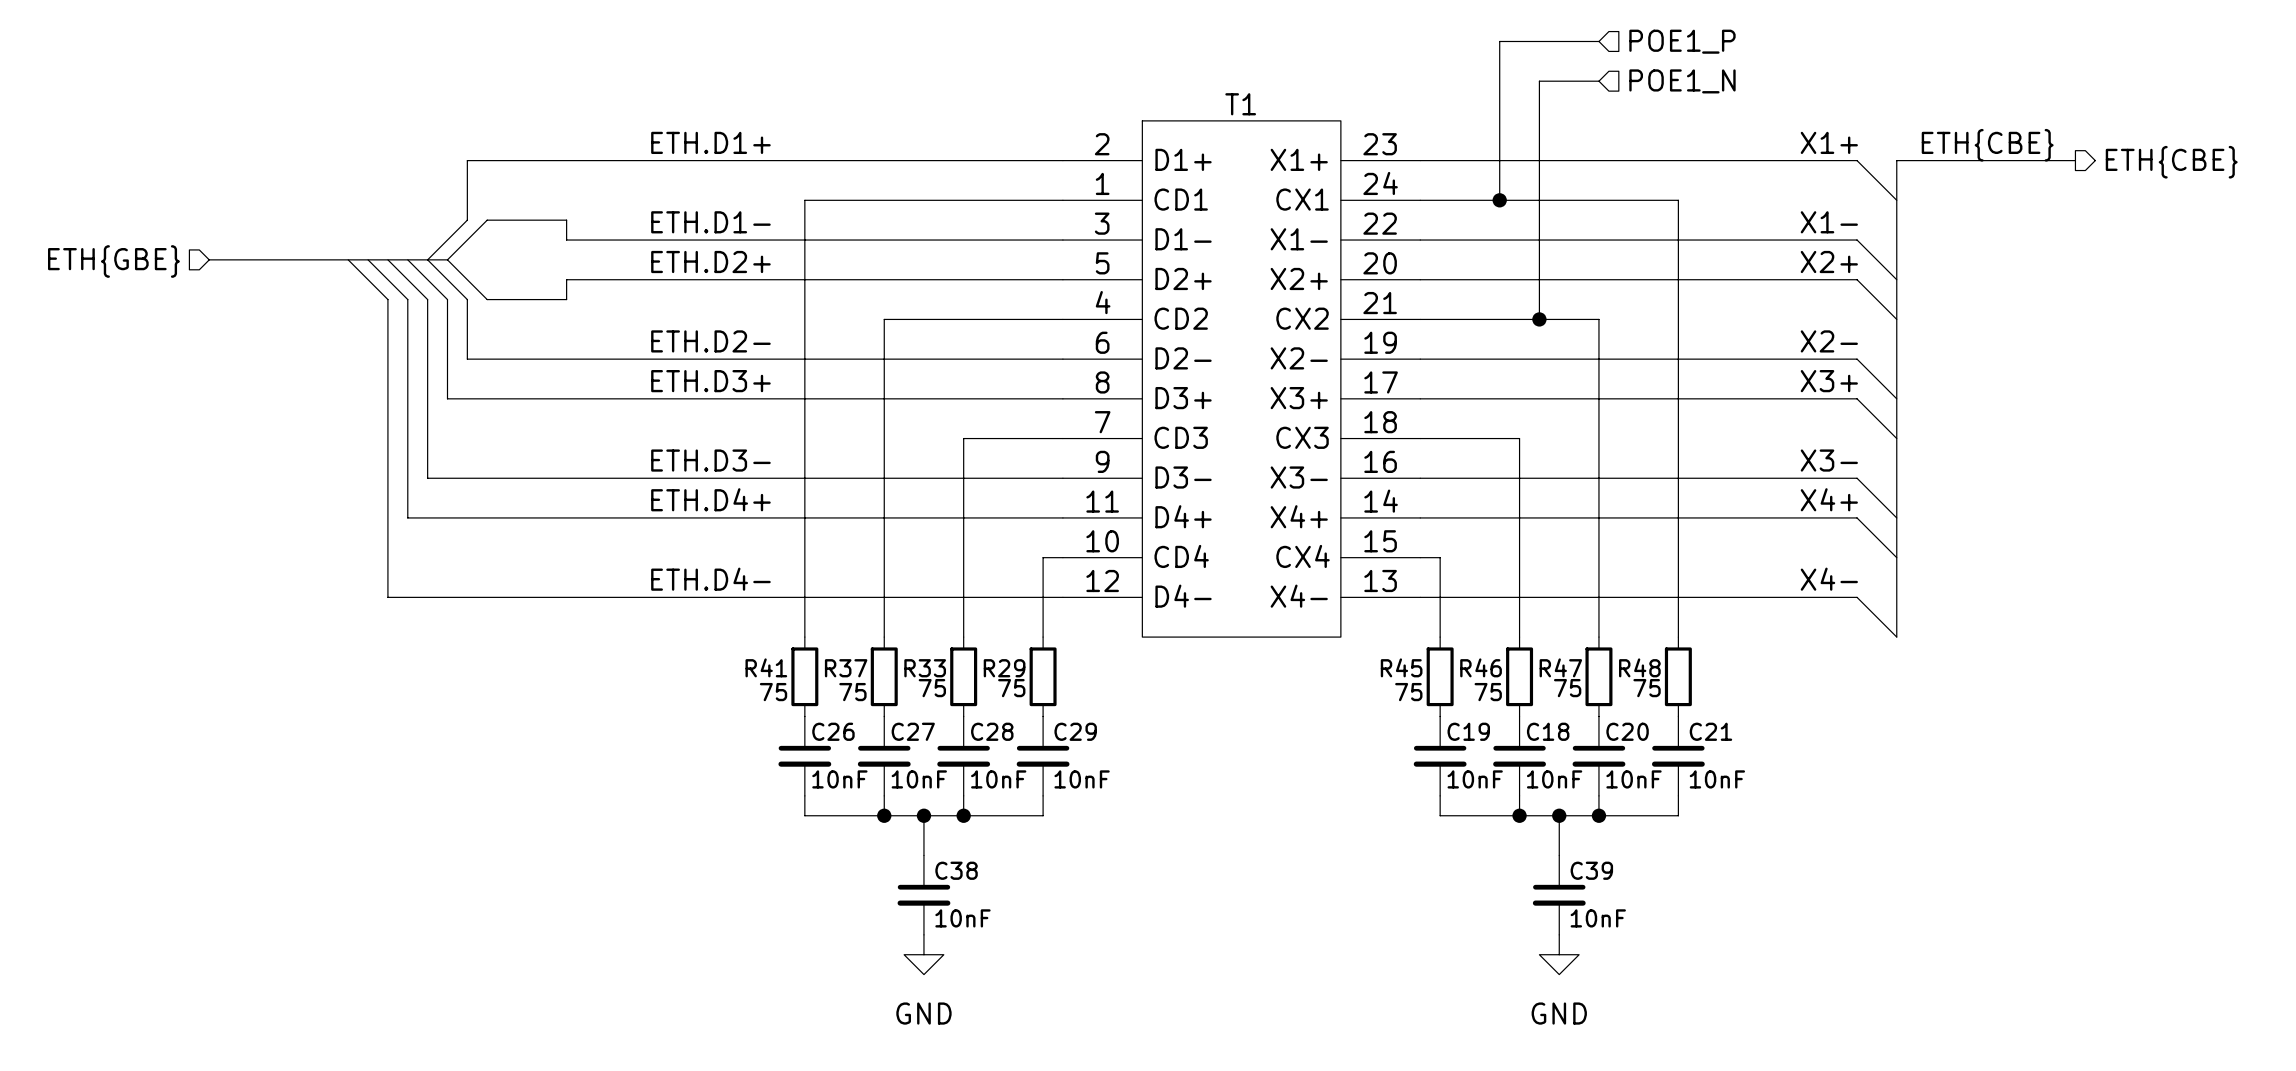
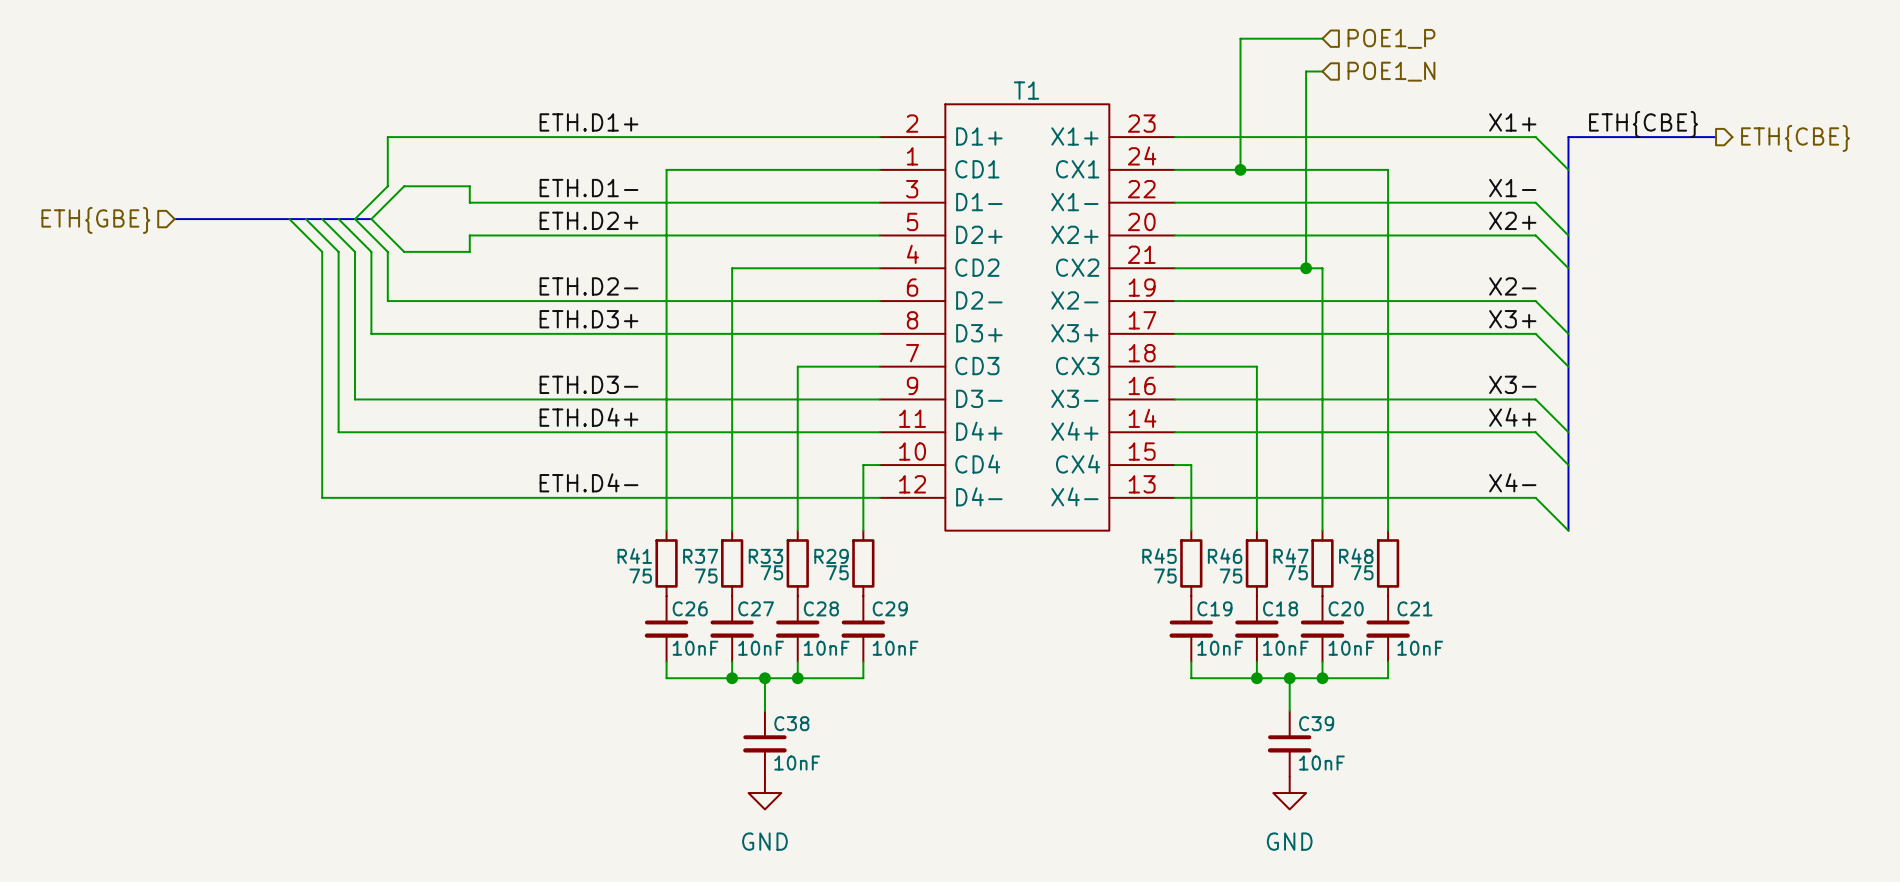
wire: (1579, 81) (1539, 81) (1539, 319) -> (1306, 71) (1306, 268)
junction position: (1539, 319) -> (1306, 268)

